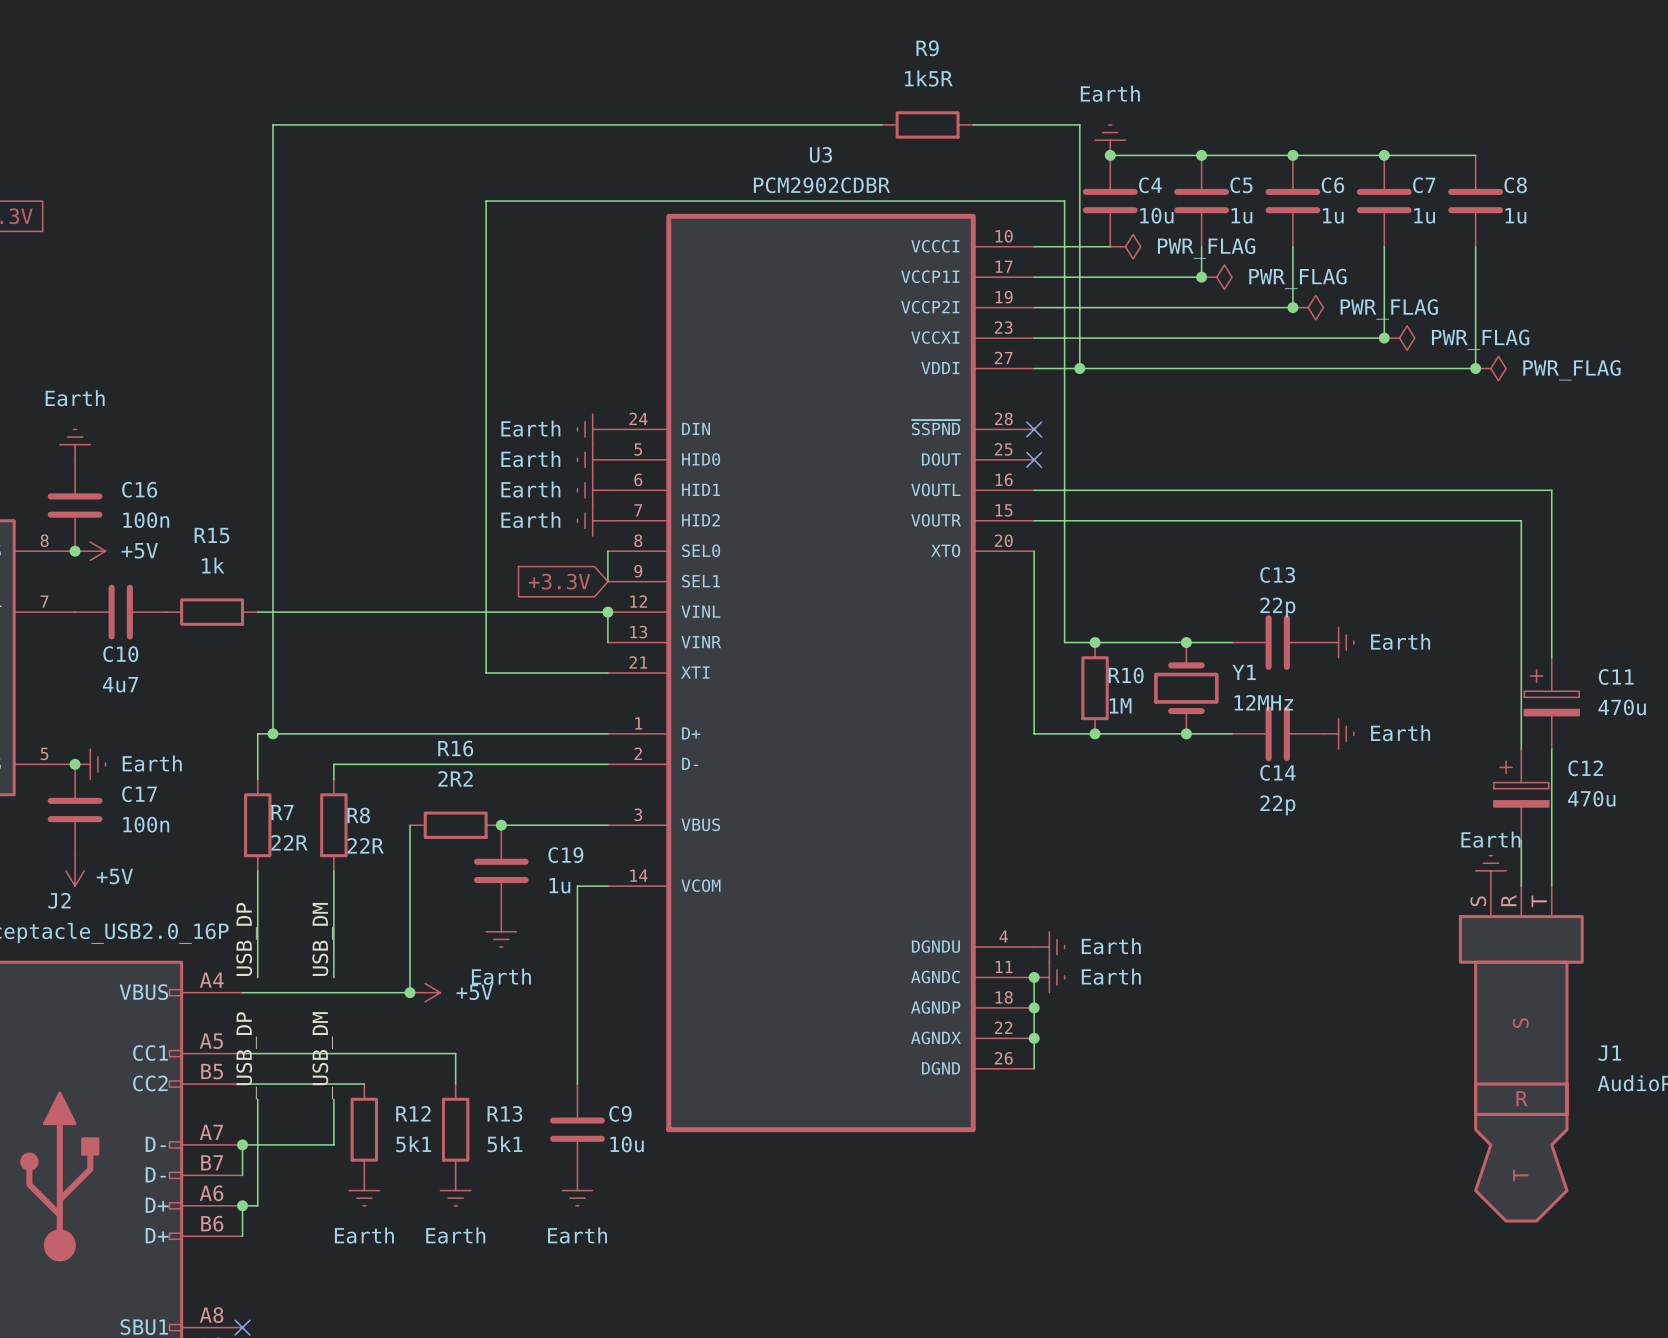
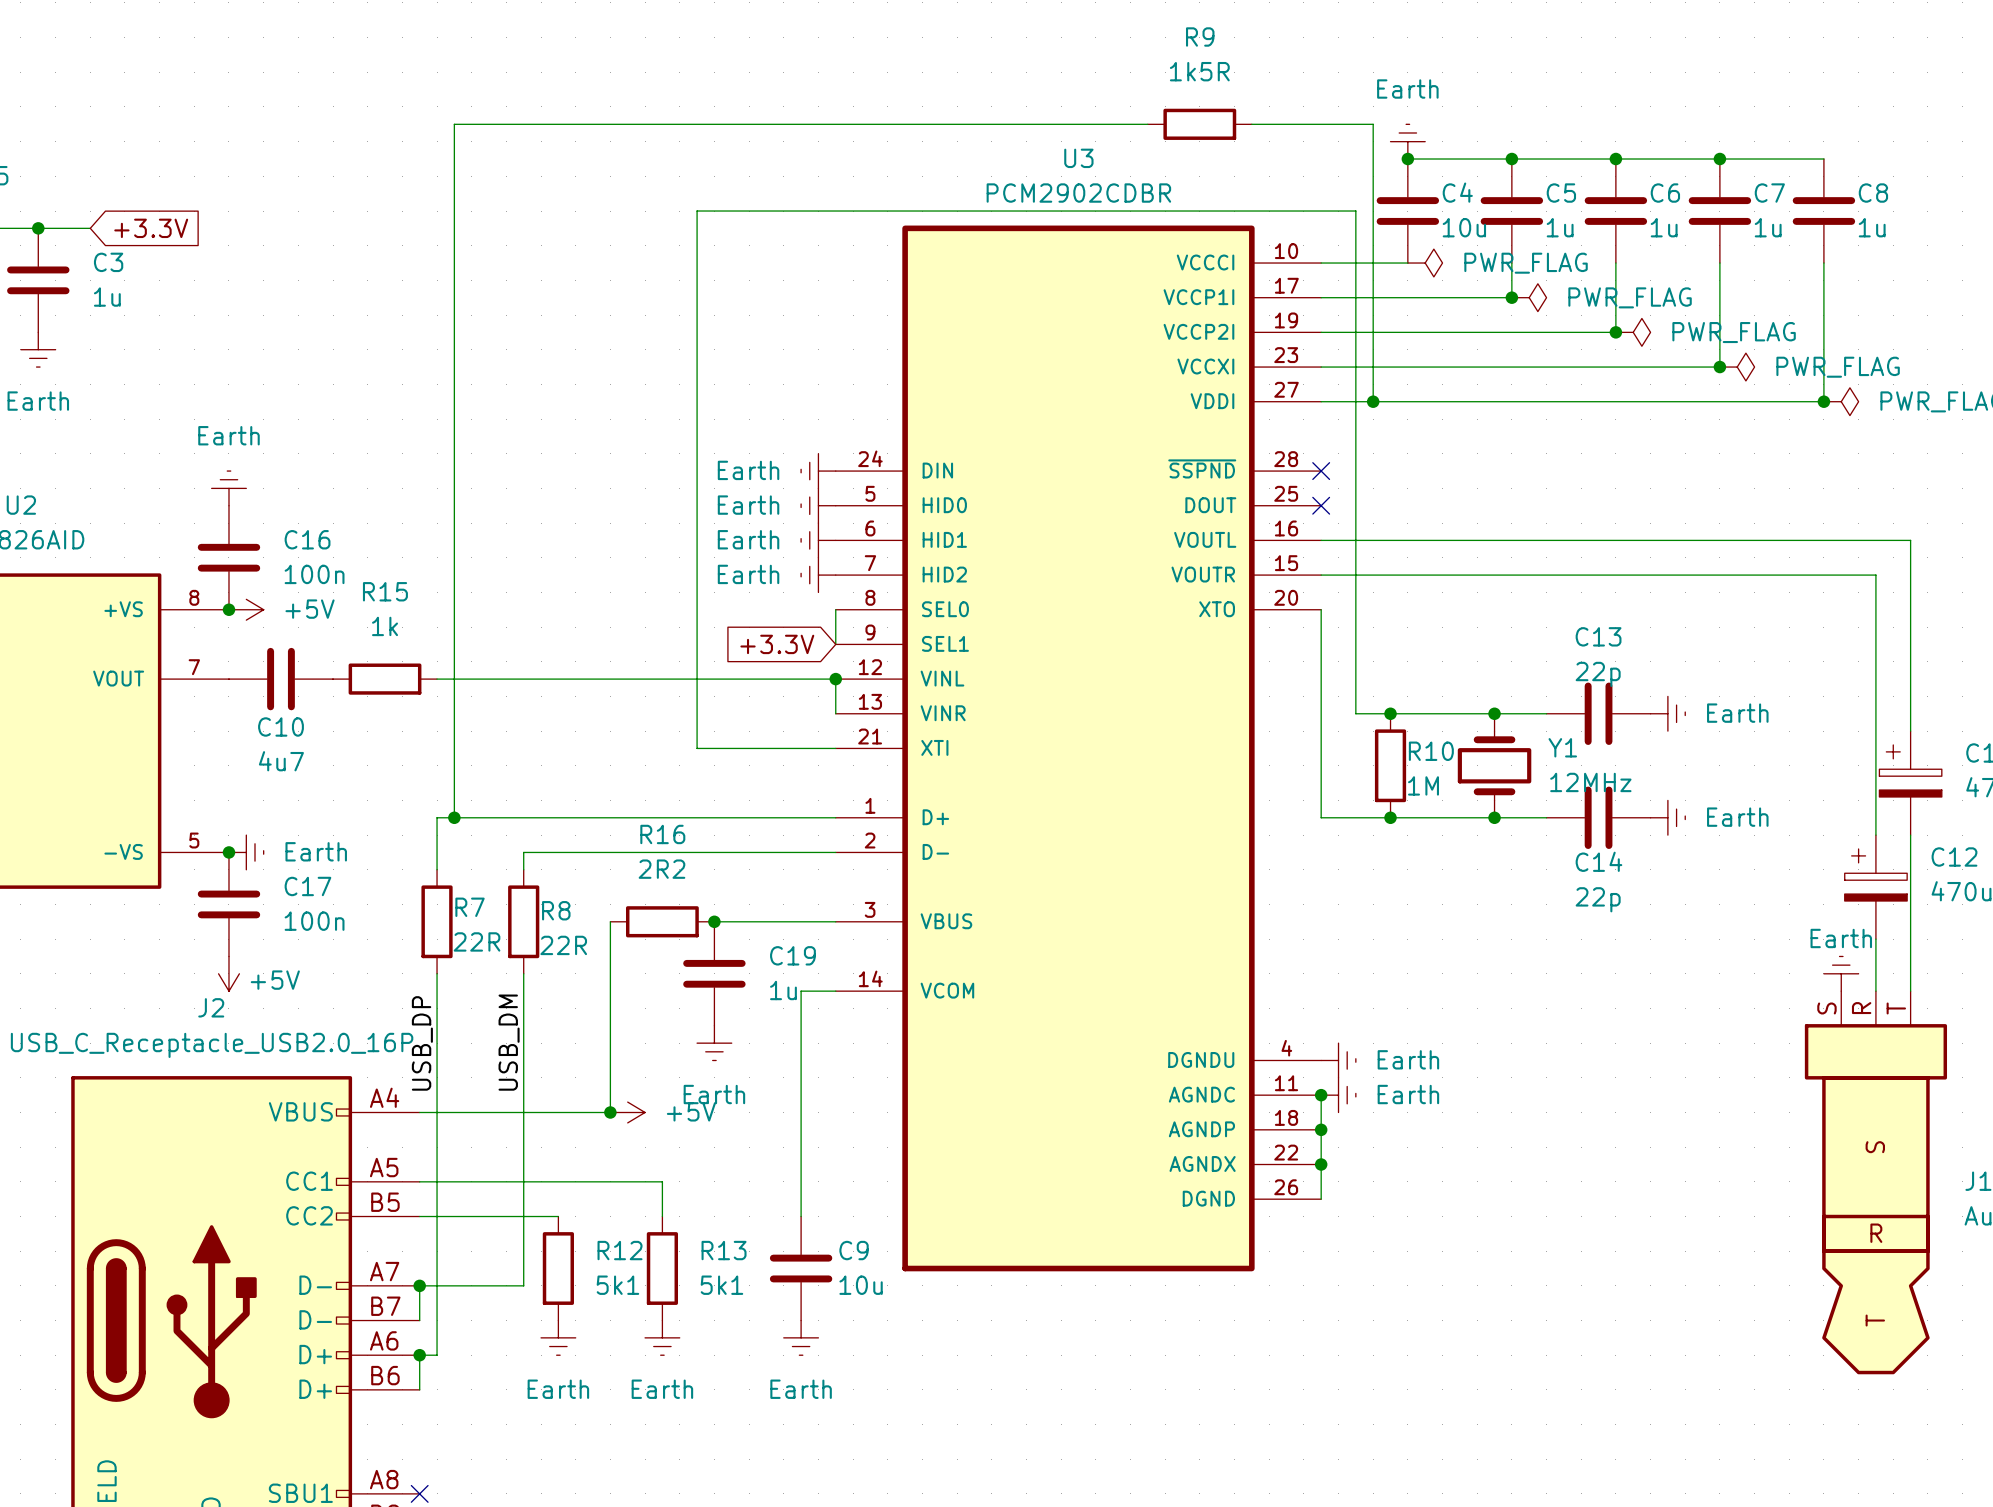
wire: none -> (437, 1095) (437, 1233)
wire: none -> (523, 1095) (523, 1233)
label: _USB_DP (246, 1055) -> none
label: _USB_DM (322, 1055) -> none

